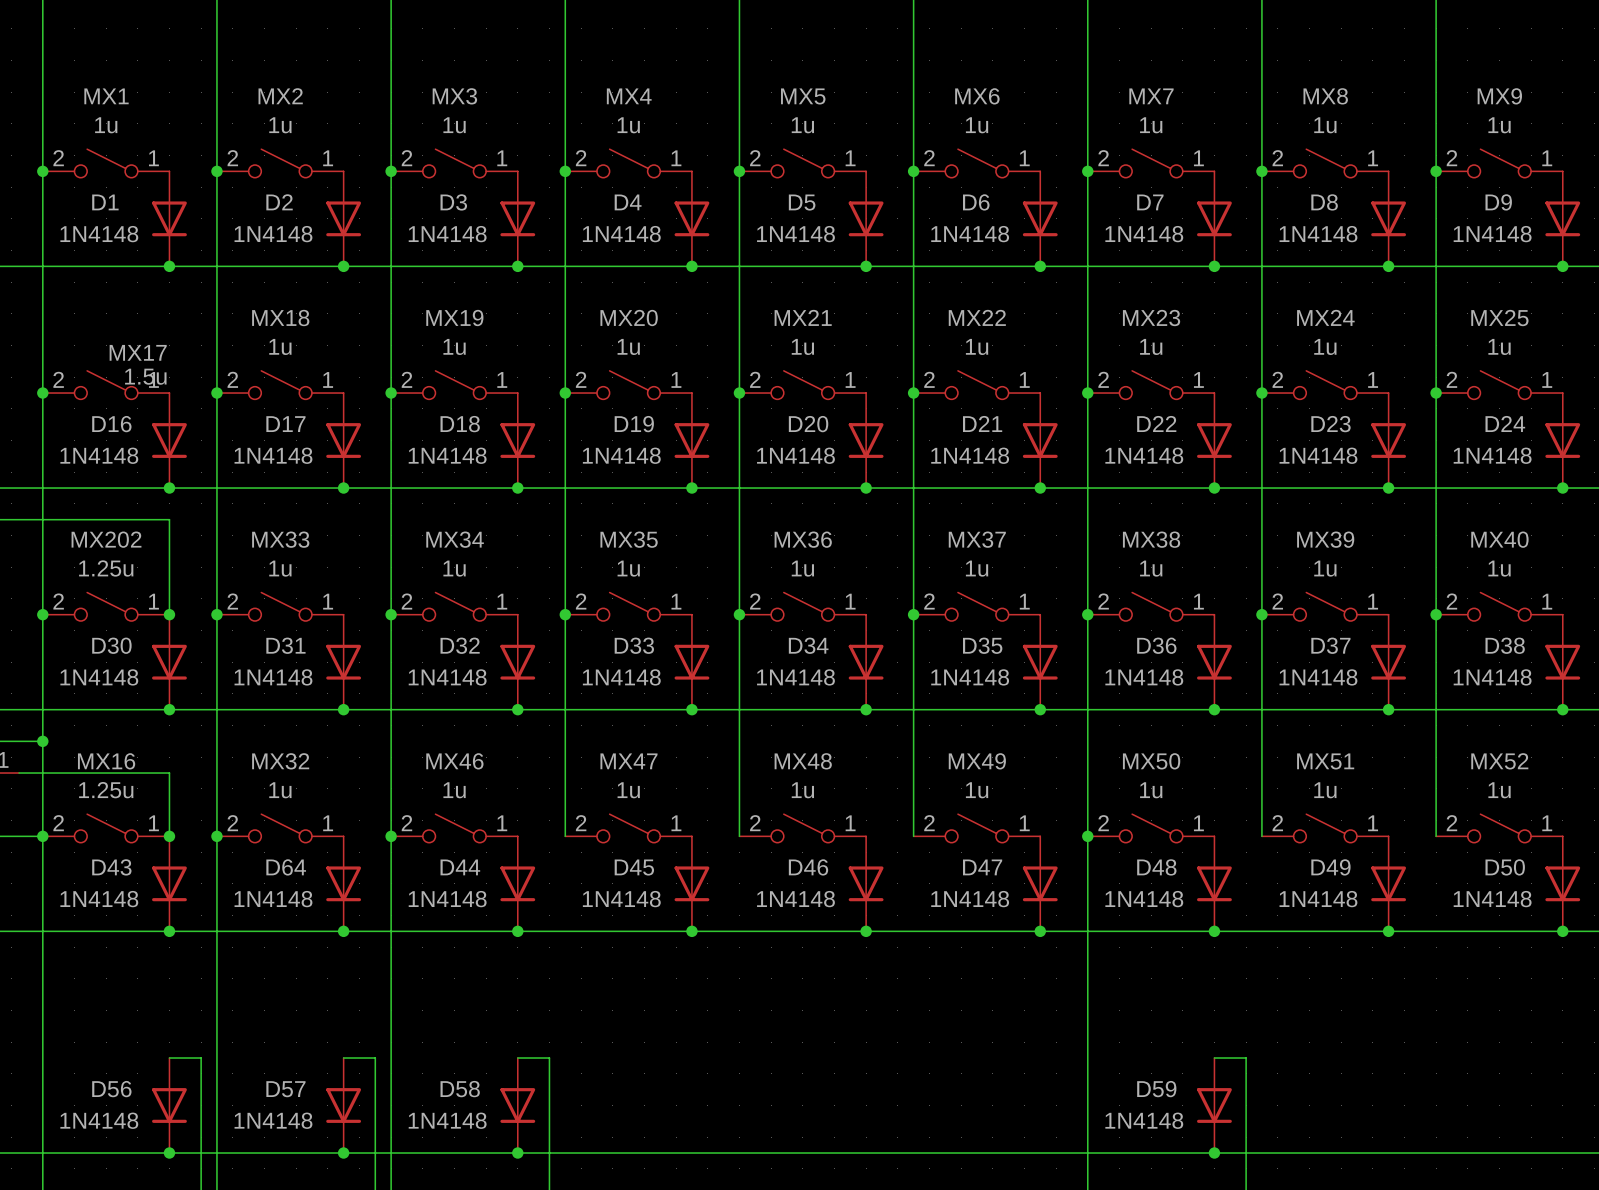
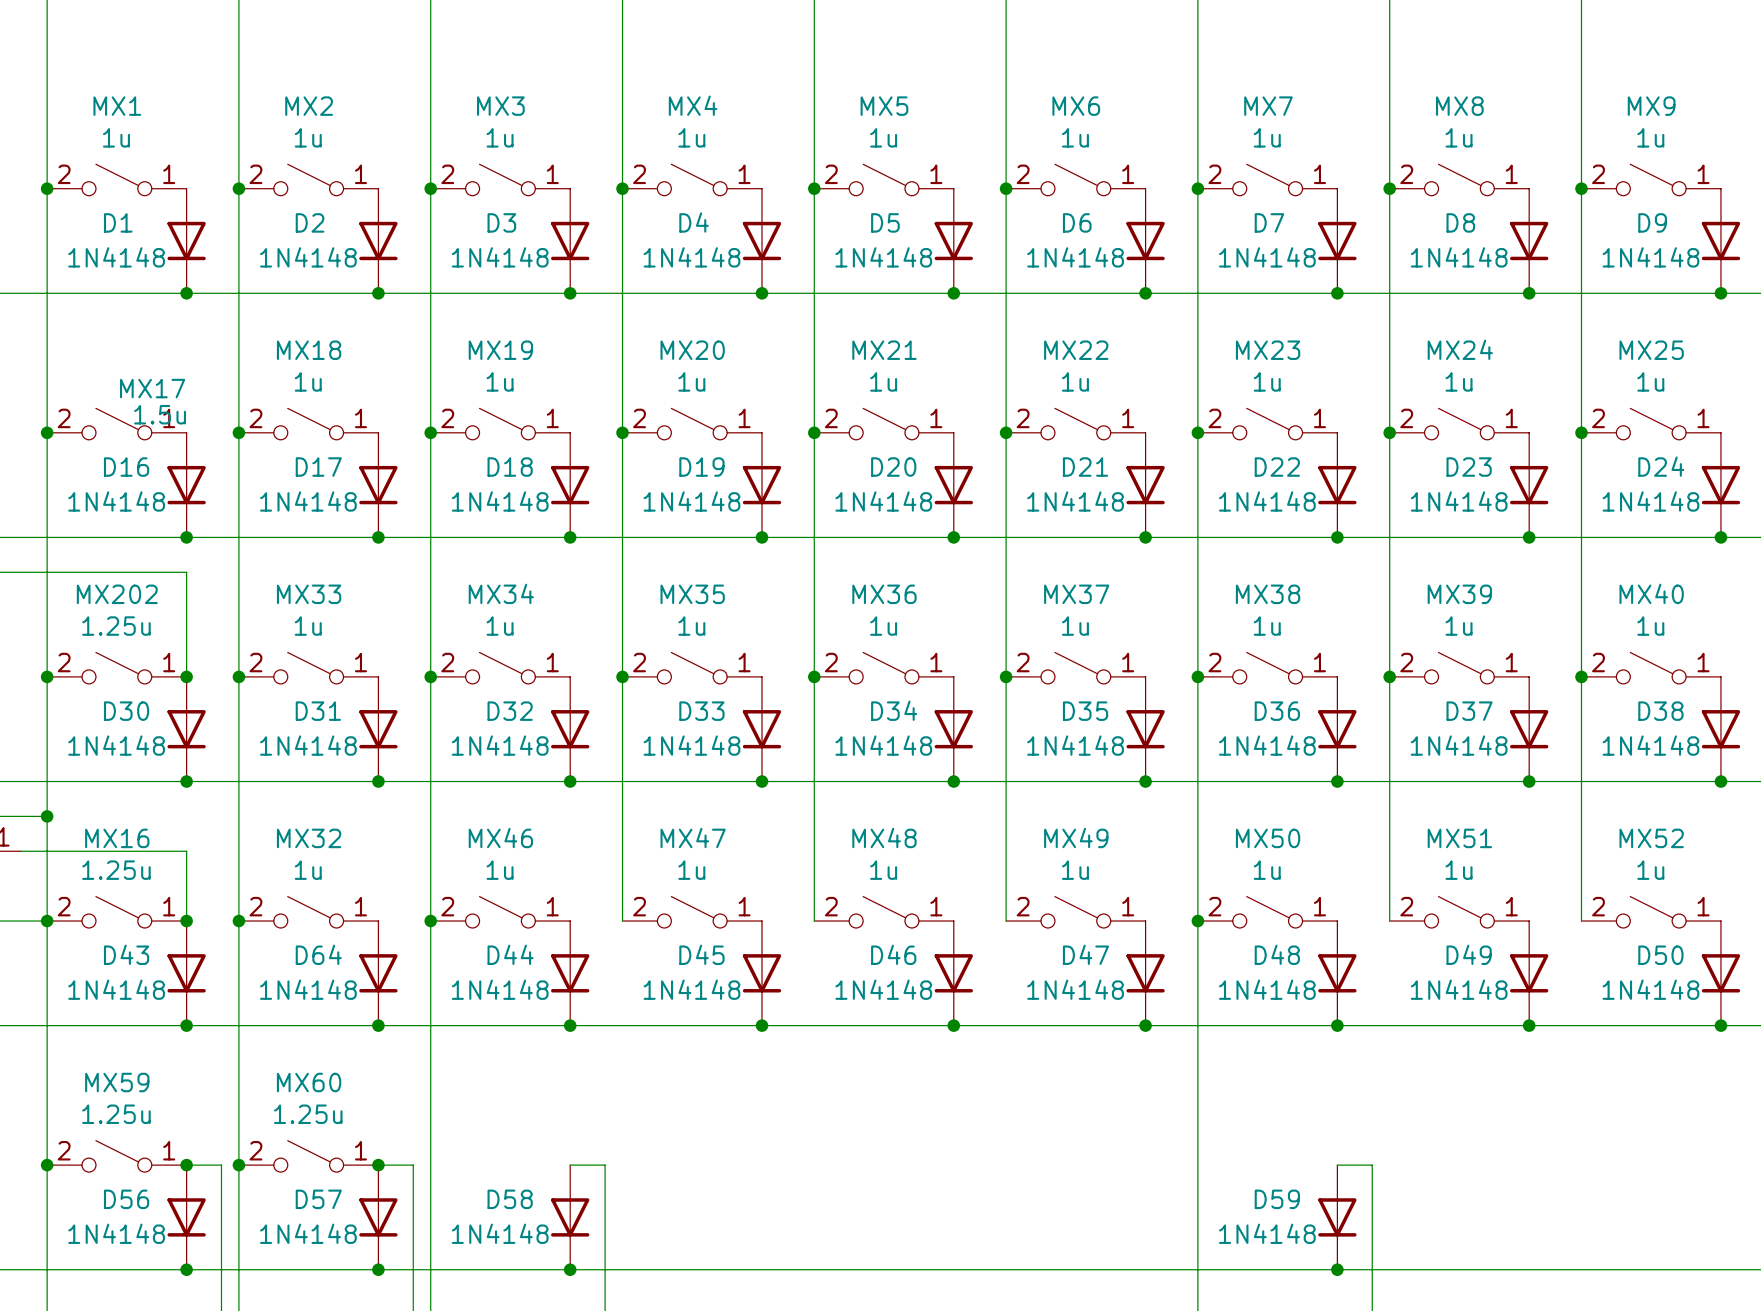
MX59: none -> 1.25u (116, 1156)
MX60: none -> 1.25u (308, 1156)
junction: none -> (47, 1165)
junction: none -> (186, 1165)
junction: none -> (238, 1165)
junction: none -> (378, 1165)

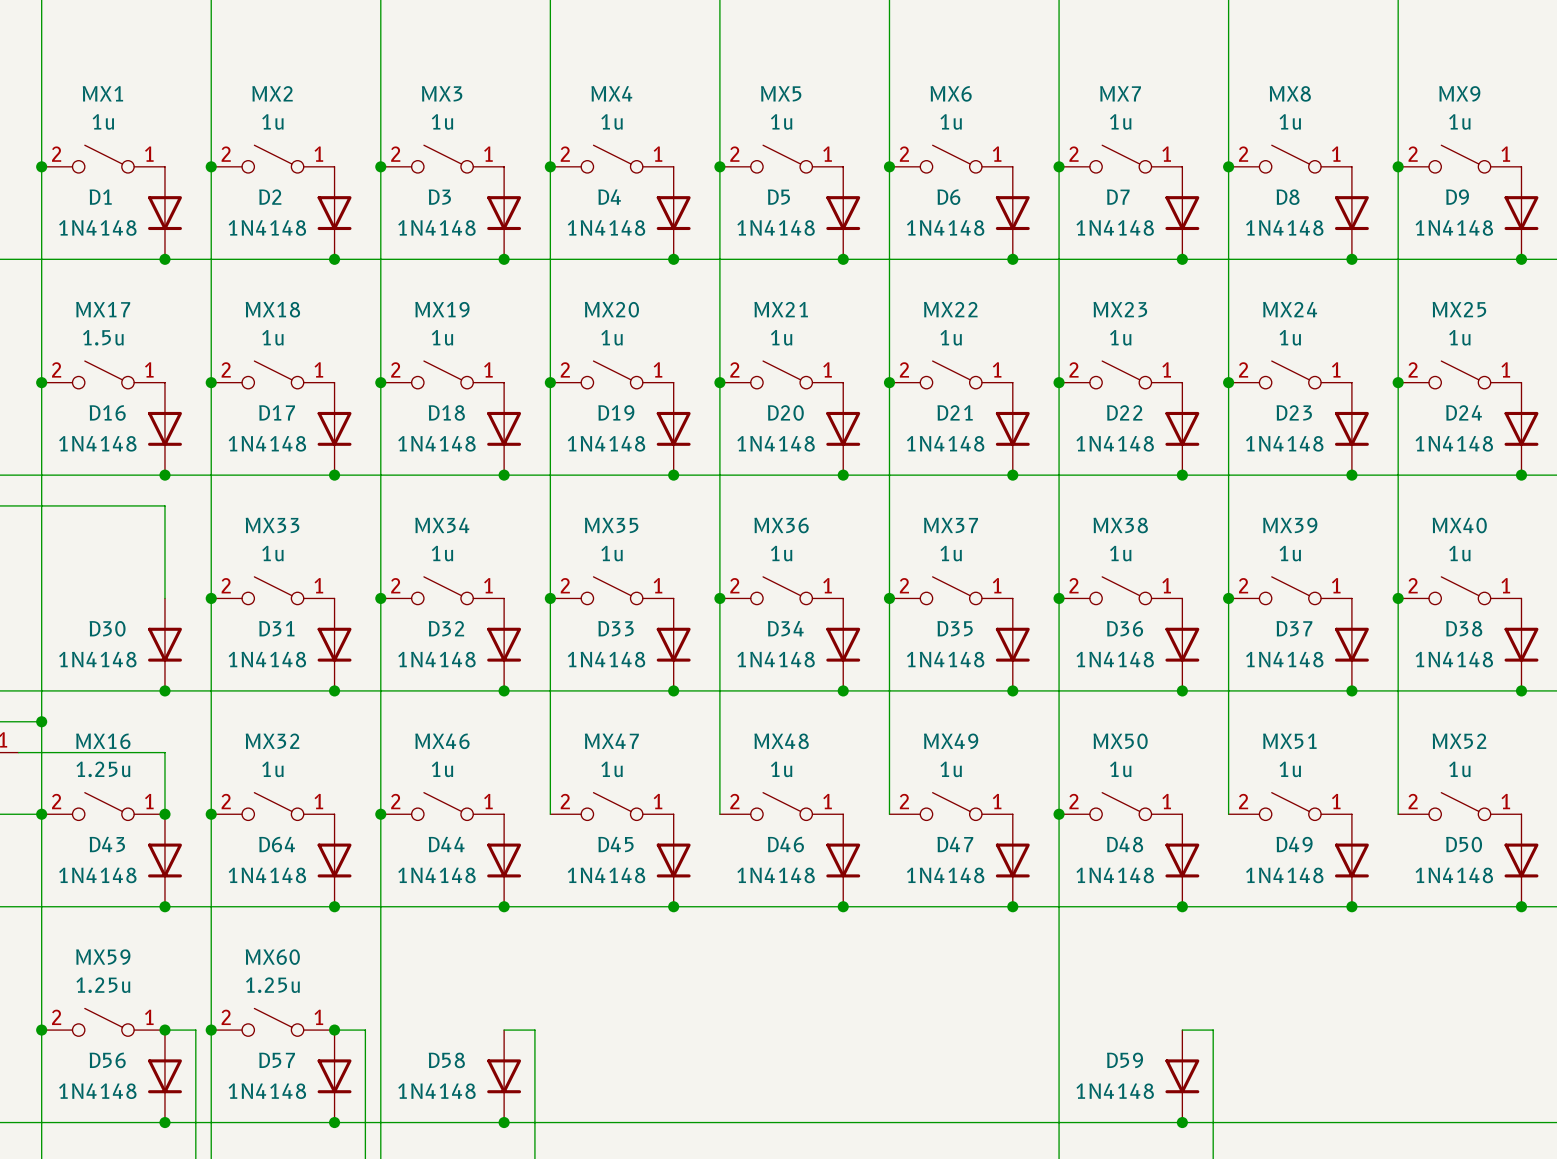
MX17 name position: MX17 (152, 388) -> MX17 (103, 309)
MX17 value position: 1.5u (160, 414) -> 1.5u (103, 337)
MX202: 1.25u (116, 668) -> none
junction: (47, 676) -> none
junction: (186, 676) -> none

